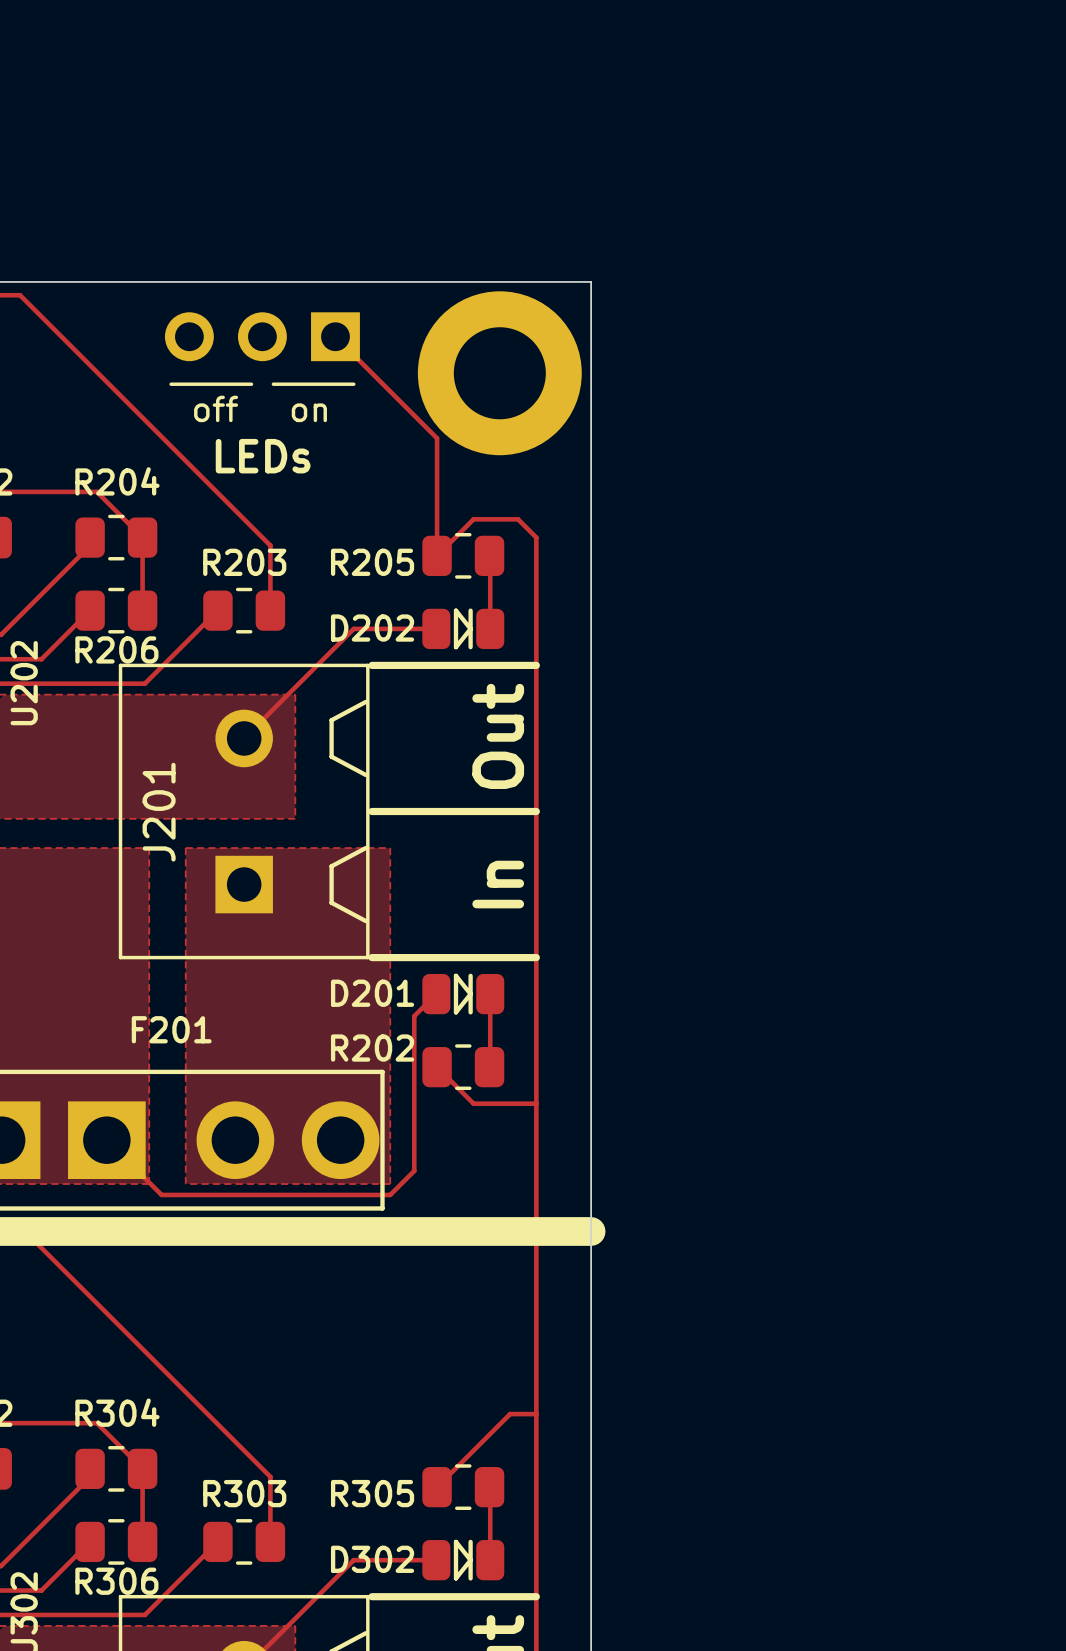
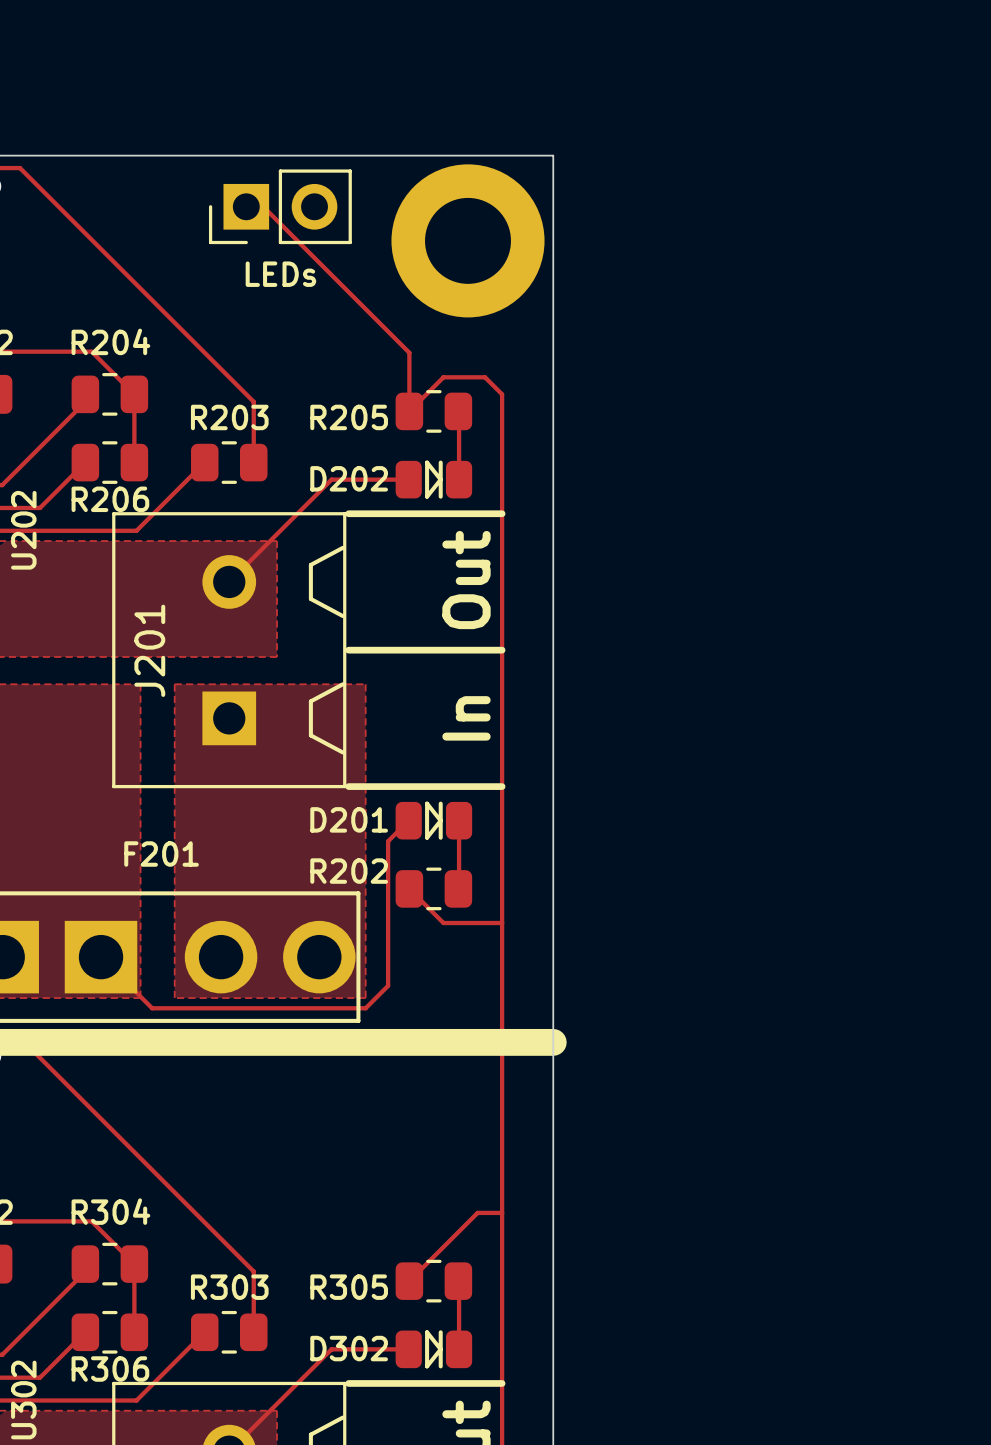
part: (262, 336) -> none
part: none -> (280, 206)
track: (335, 336) (437, 438) (437, 493) -> (263, 206) (409, 352)
line: (171, 384) (251, 384) -> none
line: (273, 384) (353, 384) -> none
text: off (216, 408) -> none
text: on (309, 412) -> LEDs (280, 274)
text: LEDs (263, 456) -> none

